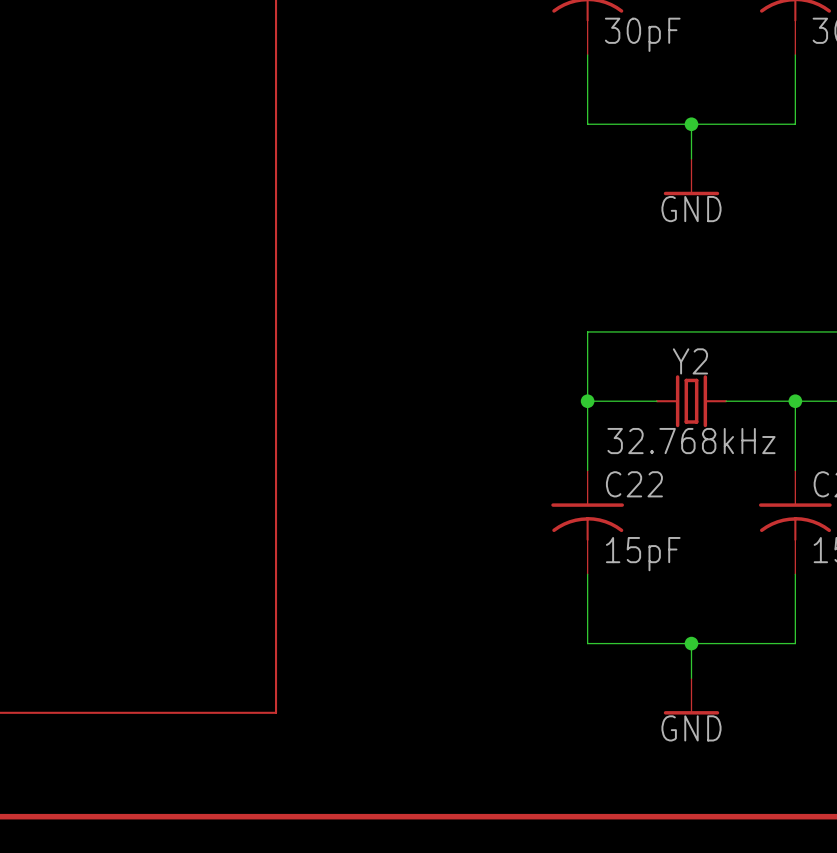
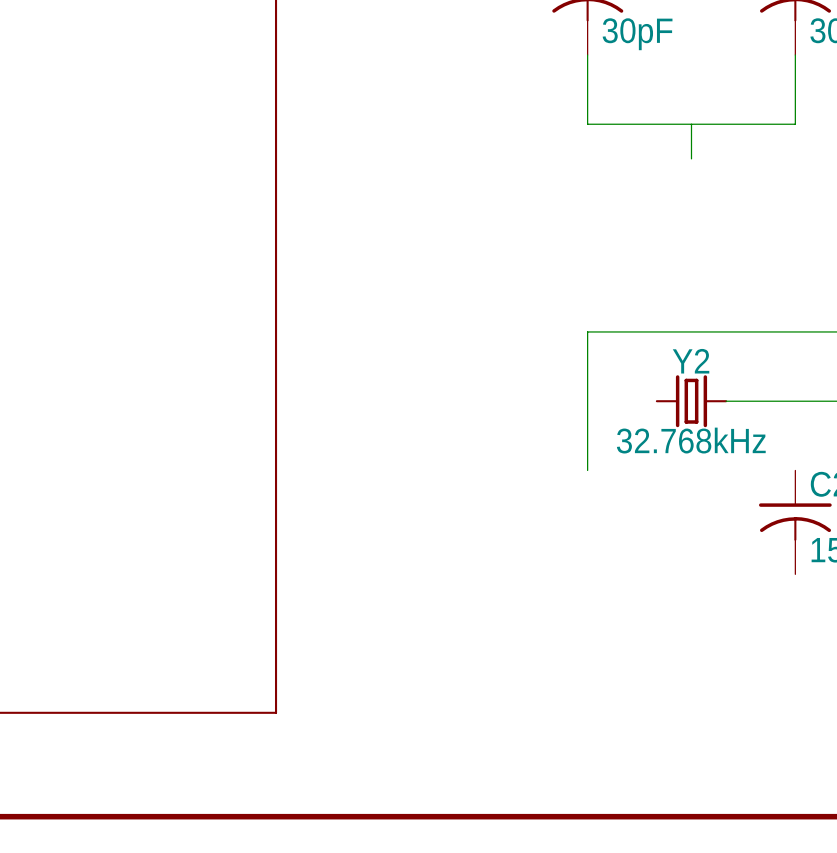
junction: (691, 124) -> none
power symbol: GND (691, 177) -> none
wire: (587, 401) (656, 401) -> none
junction: (587, 401) -> none
wire: (795, 401) (795, 470) -> none
junction: (795, 401) -> none
C22: 15pF (587, 522) -> none
wire: (587, 574) (587, 643) (795, 643) (795, 574) -> none
wire: (691, 643) (691, 678) -> none
junction: (691, 643) -> none
power symbol: GND (691, 696) -> none

